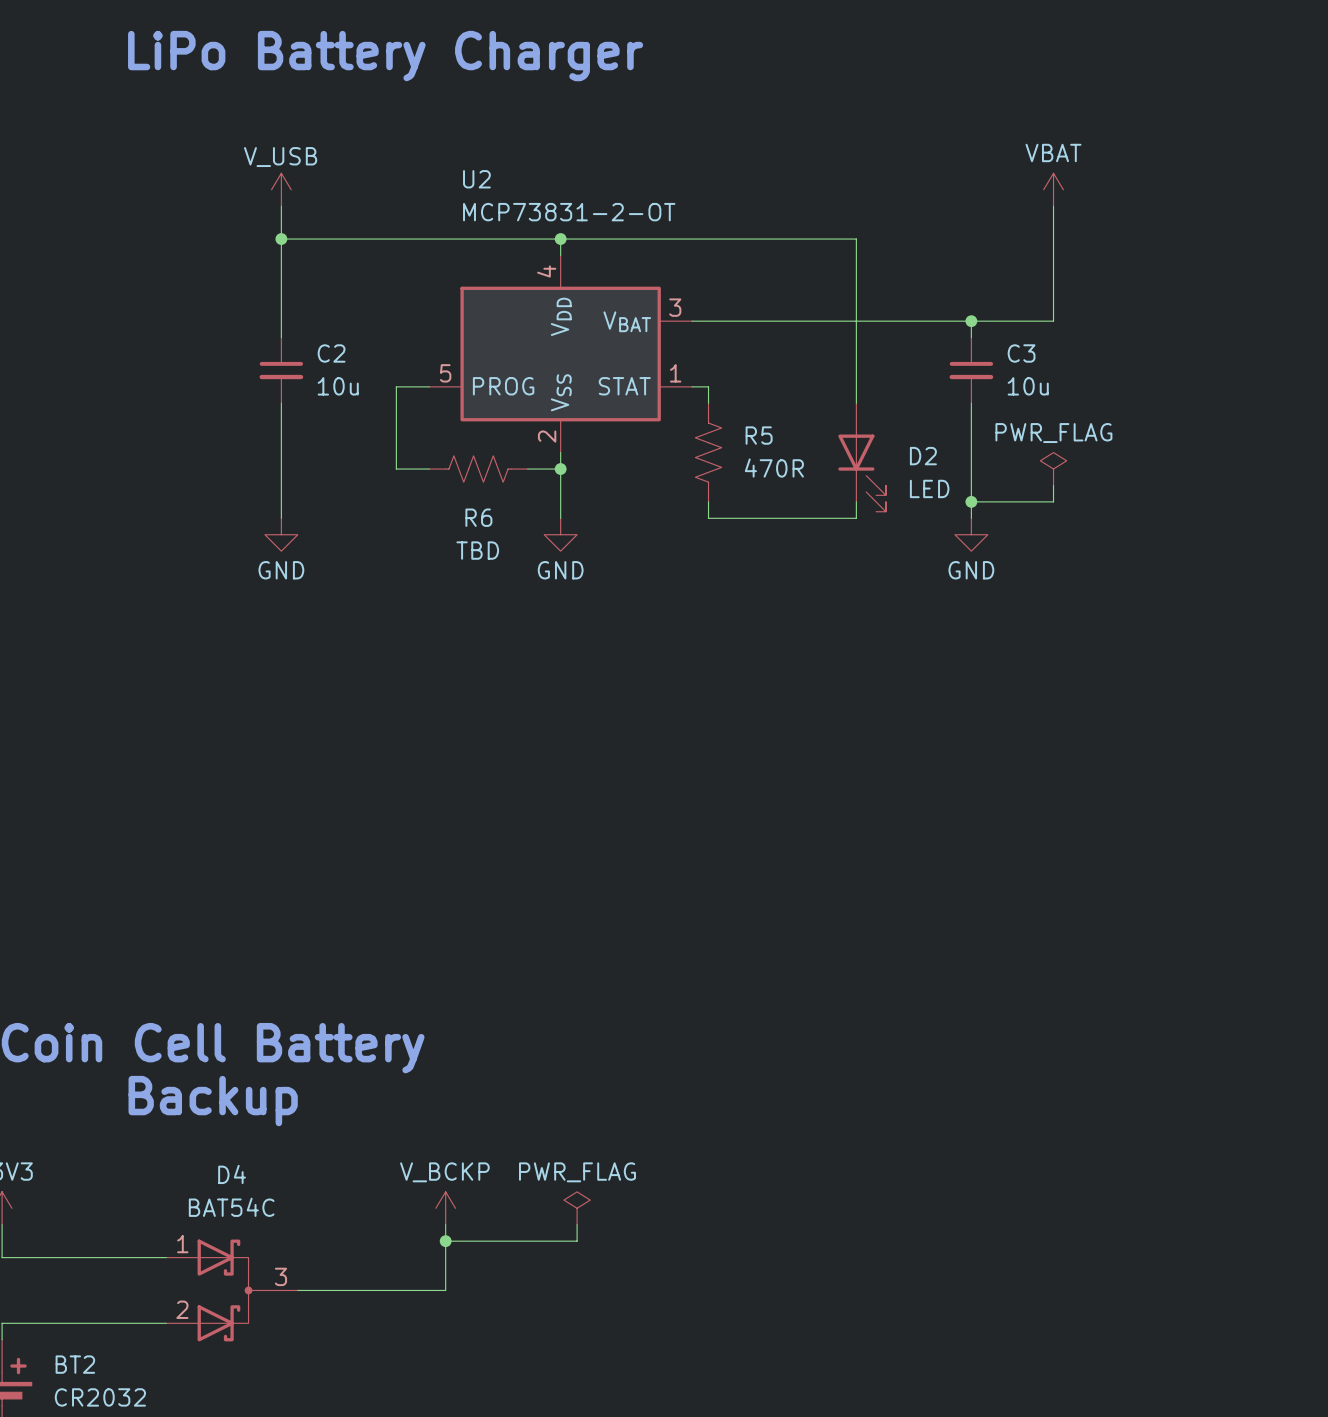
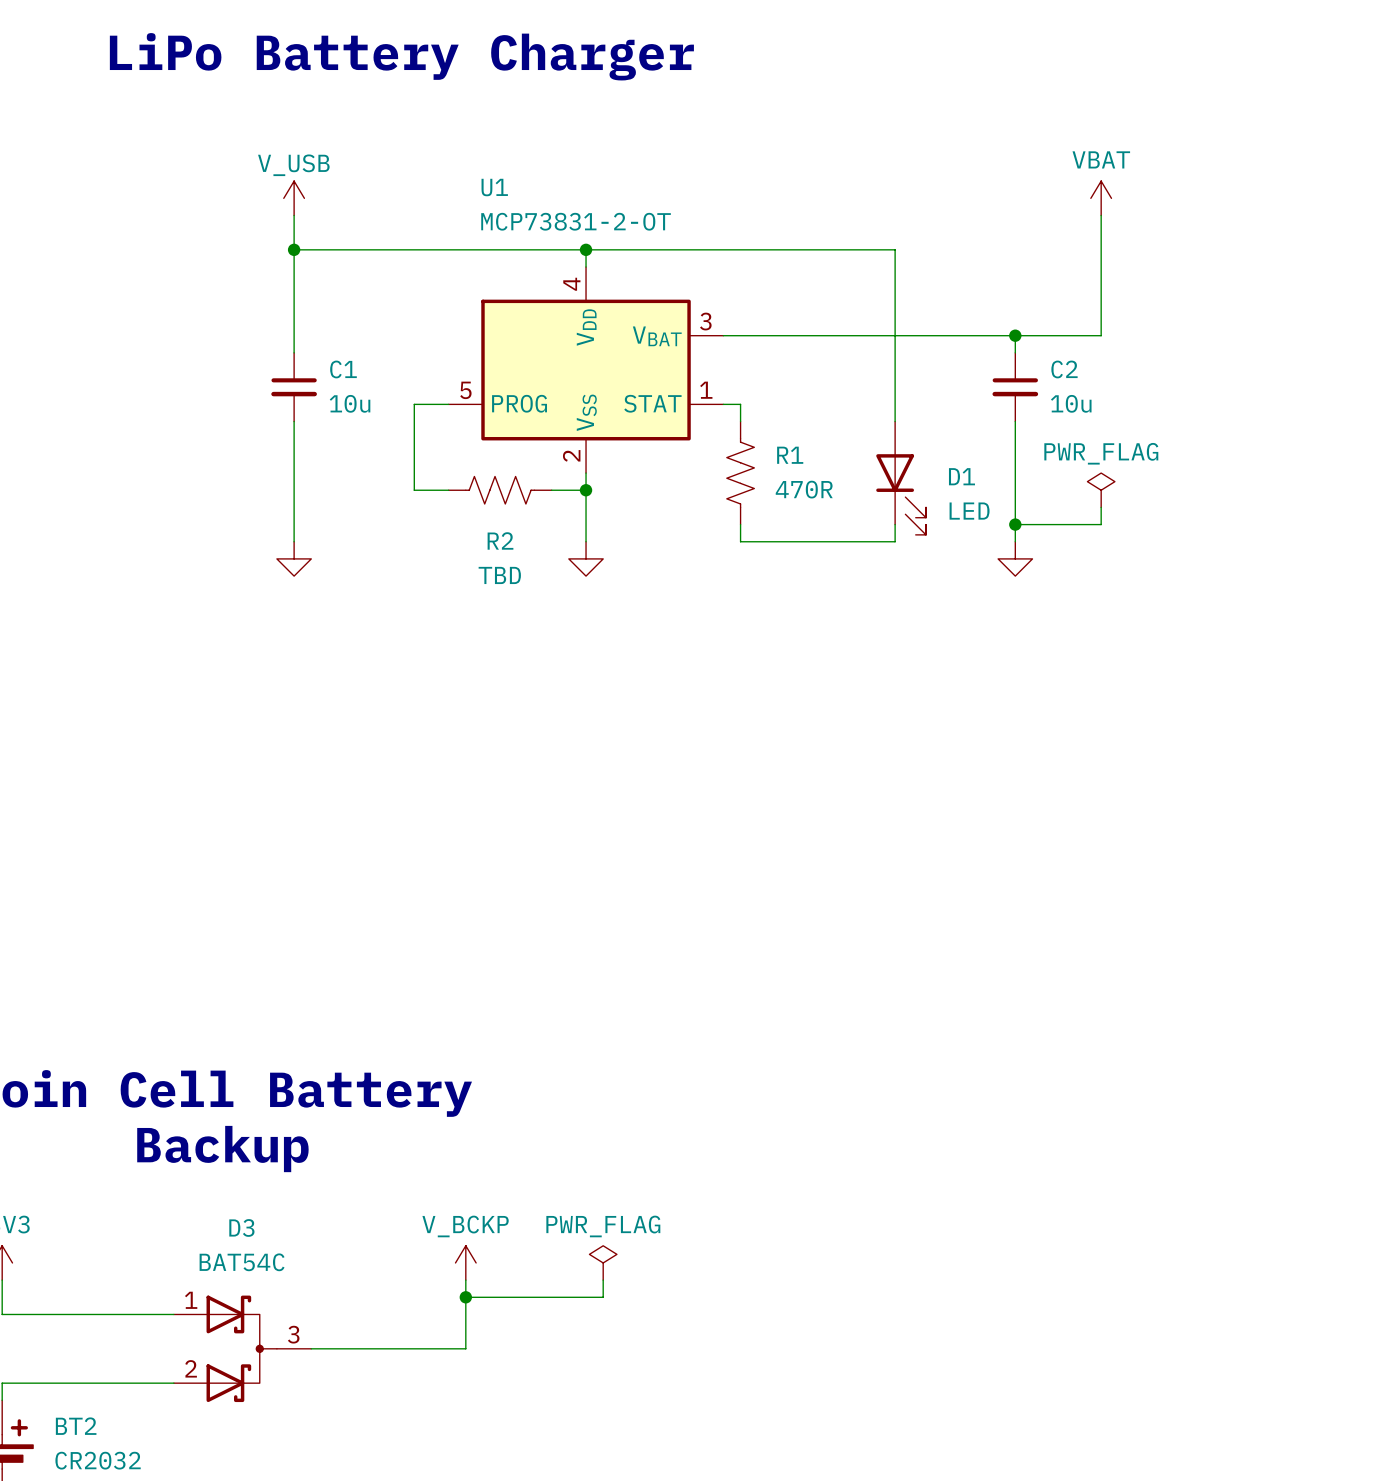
U2 name: U2 (476, 179) -> U1 (494, 187)
C2 name: C2 (331, 353) -> C1 (343, 369)
C3 name: C3 (1021, 353) -> C2 (1064, 369)
R5 name: R5 (759, 435) -> R1 (790, 455)
D2 name: D2 (923, 456) -> D1 (961, 476)
R6 name: R6 (478, 517) -> R2 (500, 540)
power symbol text: GND (281, 570) -> none
power symbol text: GND (560, 570) -> none
power symbol text: GND (971, 570) -> none
D4 name: D4 (232, 1174) -> D3 (241, 1227)

